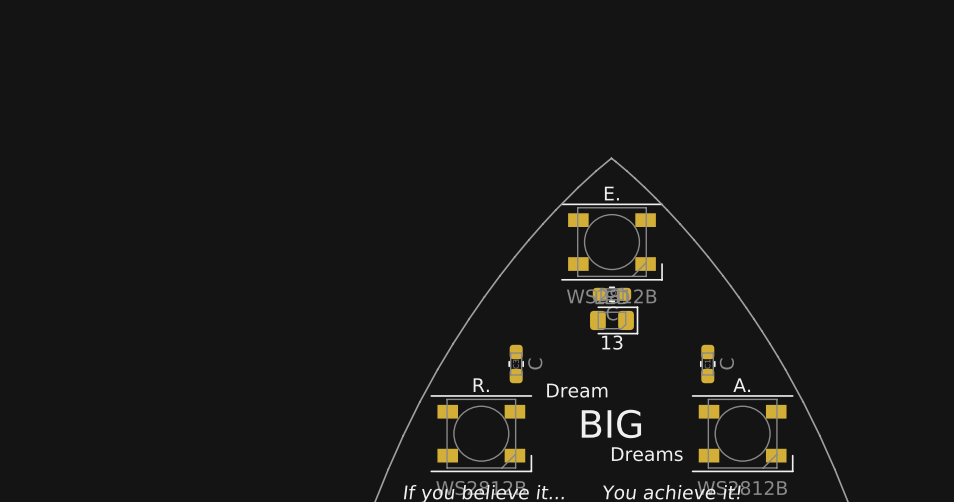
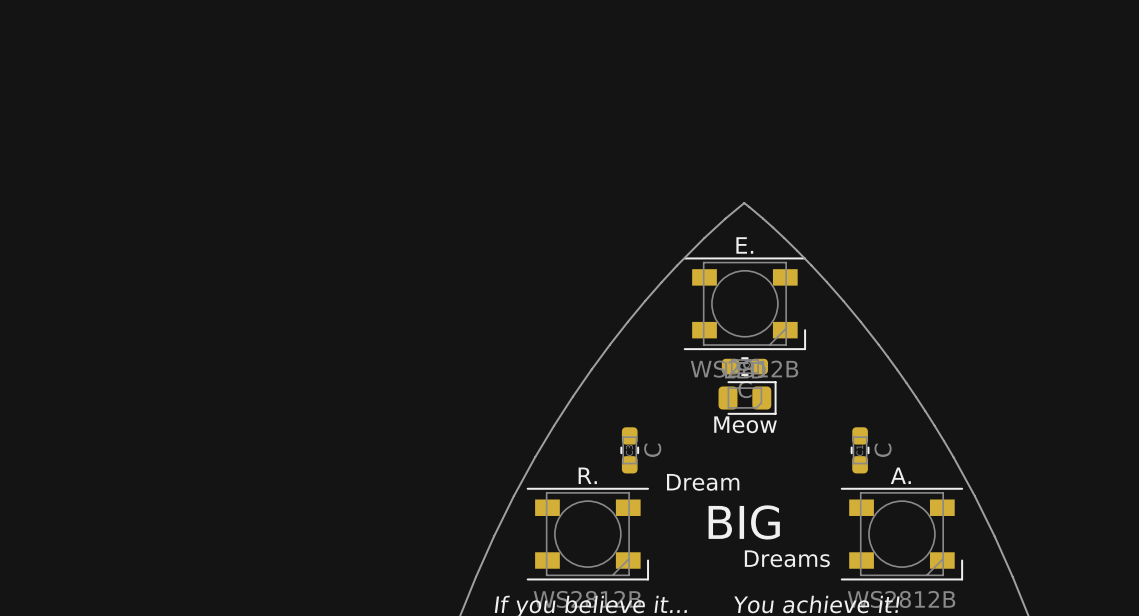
13 name: 13 (612, 342) -> Meow (745, 424)

